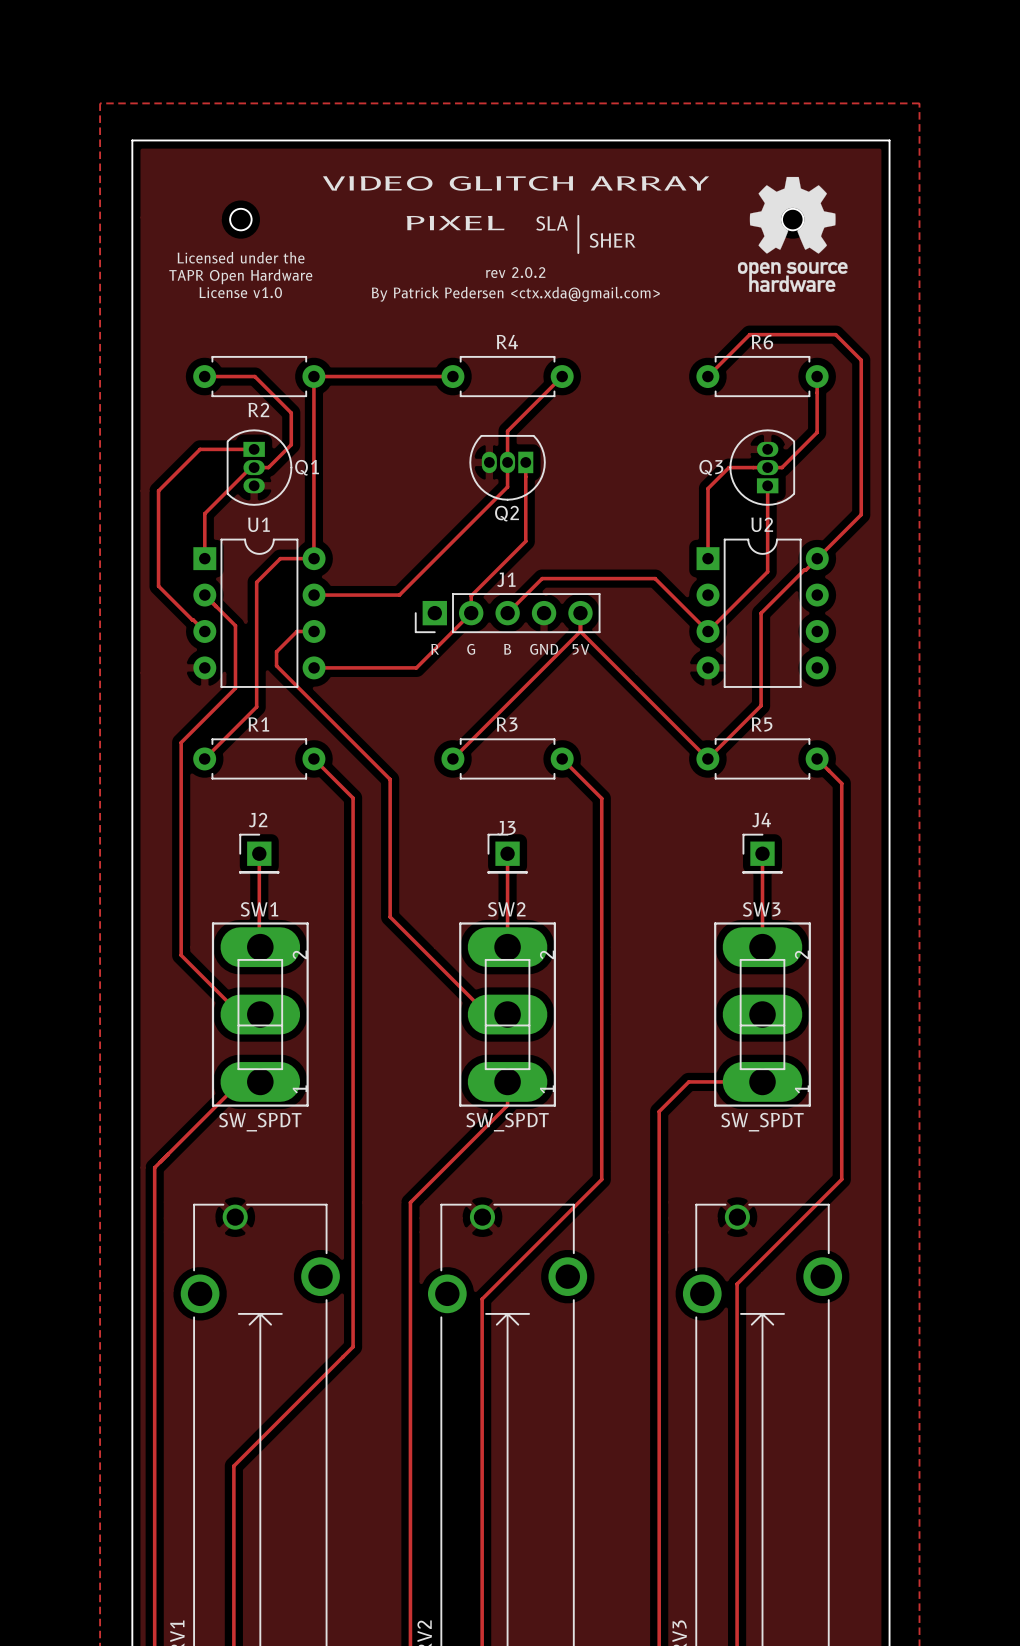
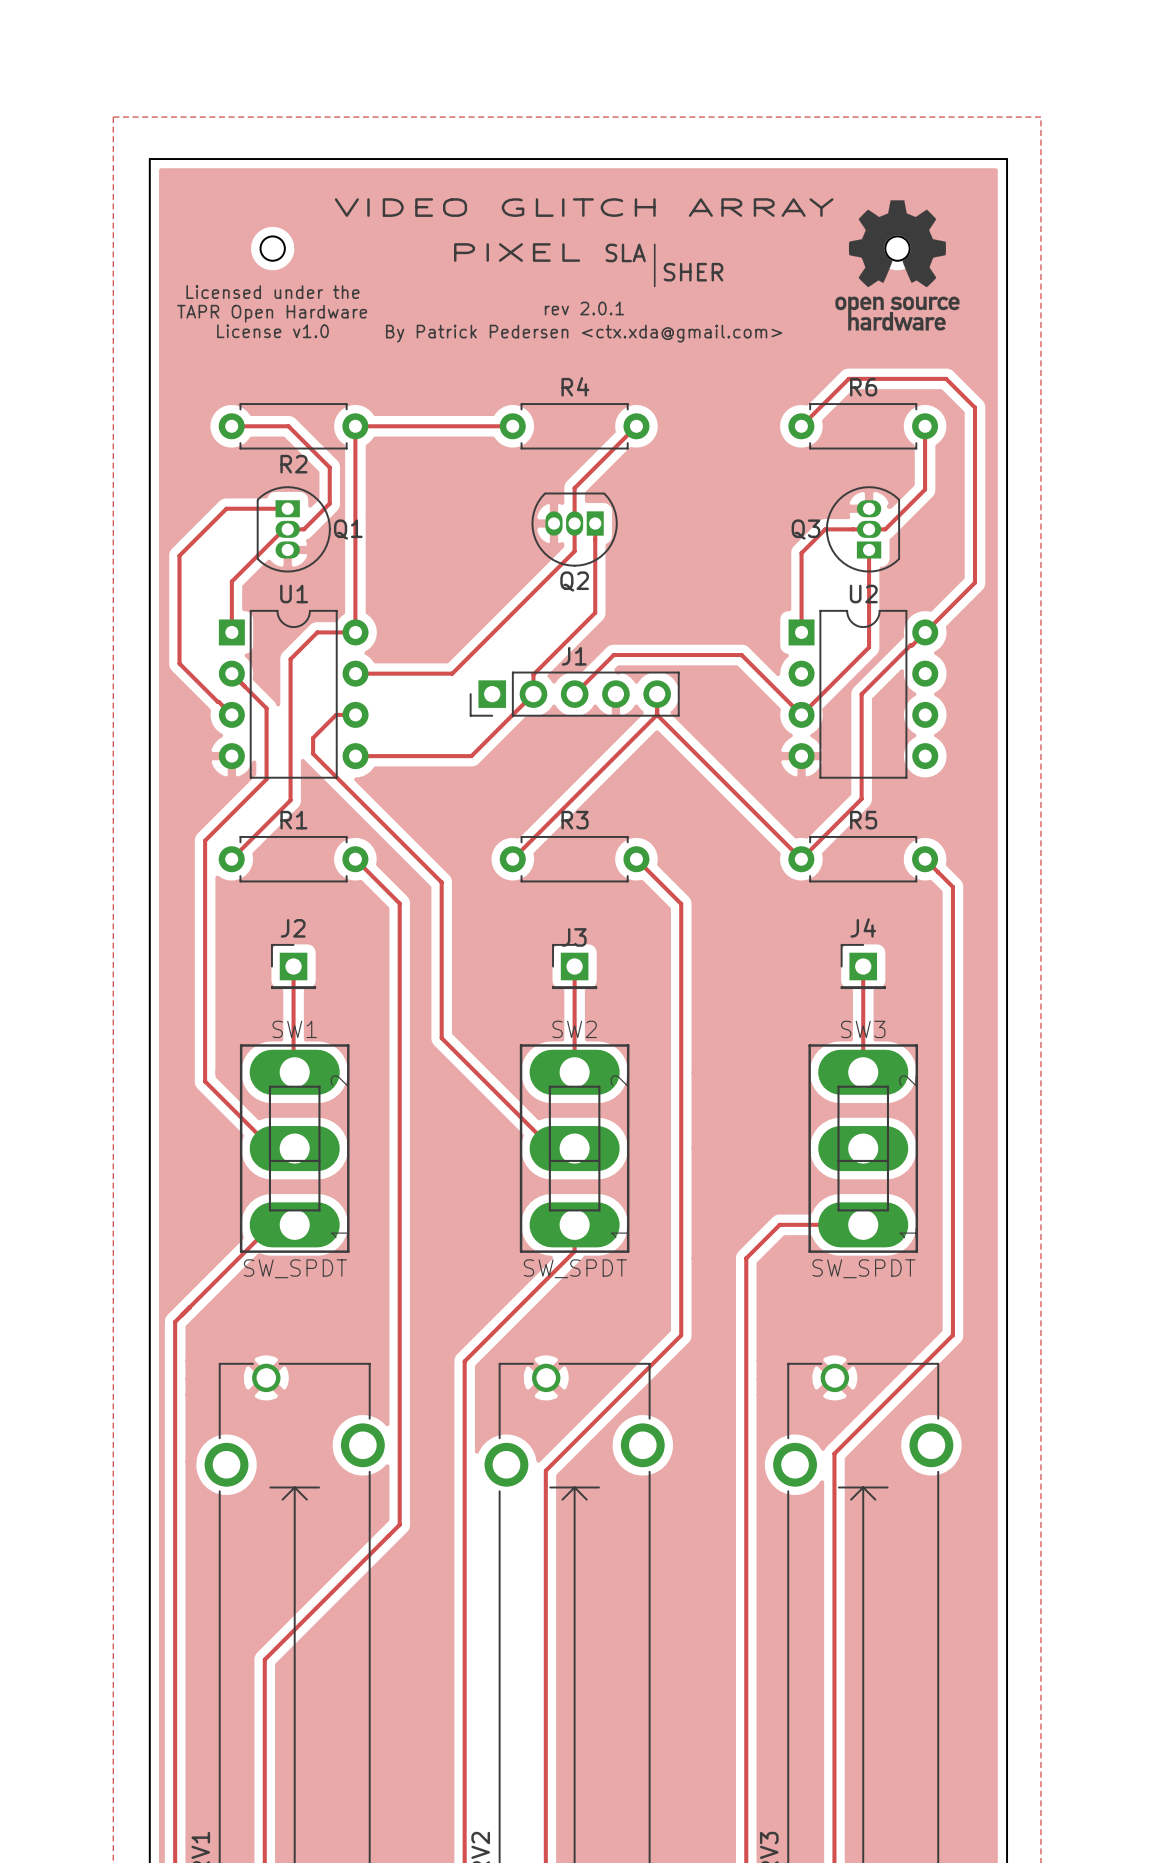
text: rev 2.0.2 (515, 272) -> rev 2.0.1 (584, 308)
text: R (435, 649) -> none
text: G (471, 649) -> none
text: B (507, 649) -> none
text: GND (544, 649) -> none
text: 5V (580, 649) -> none

